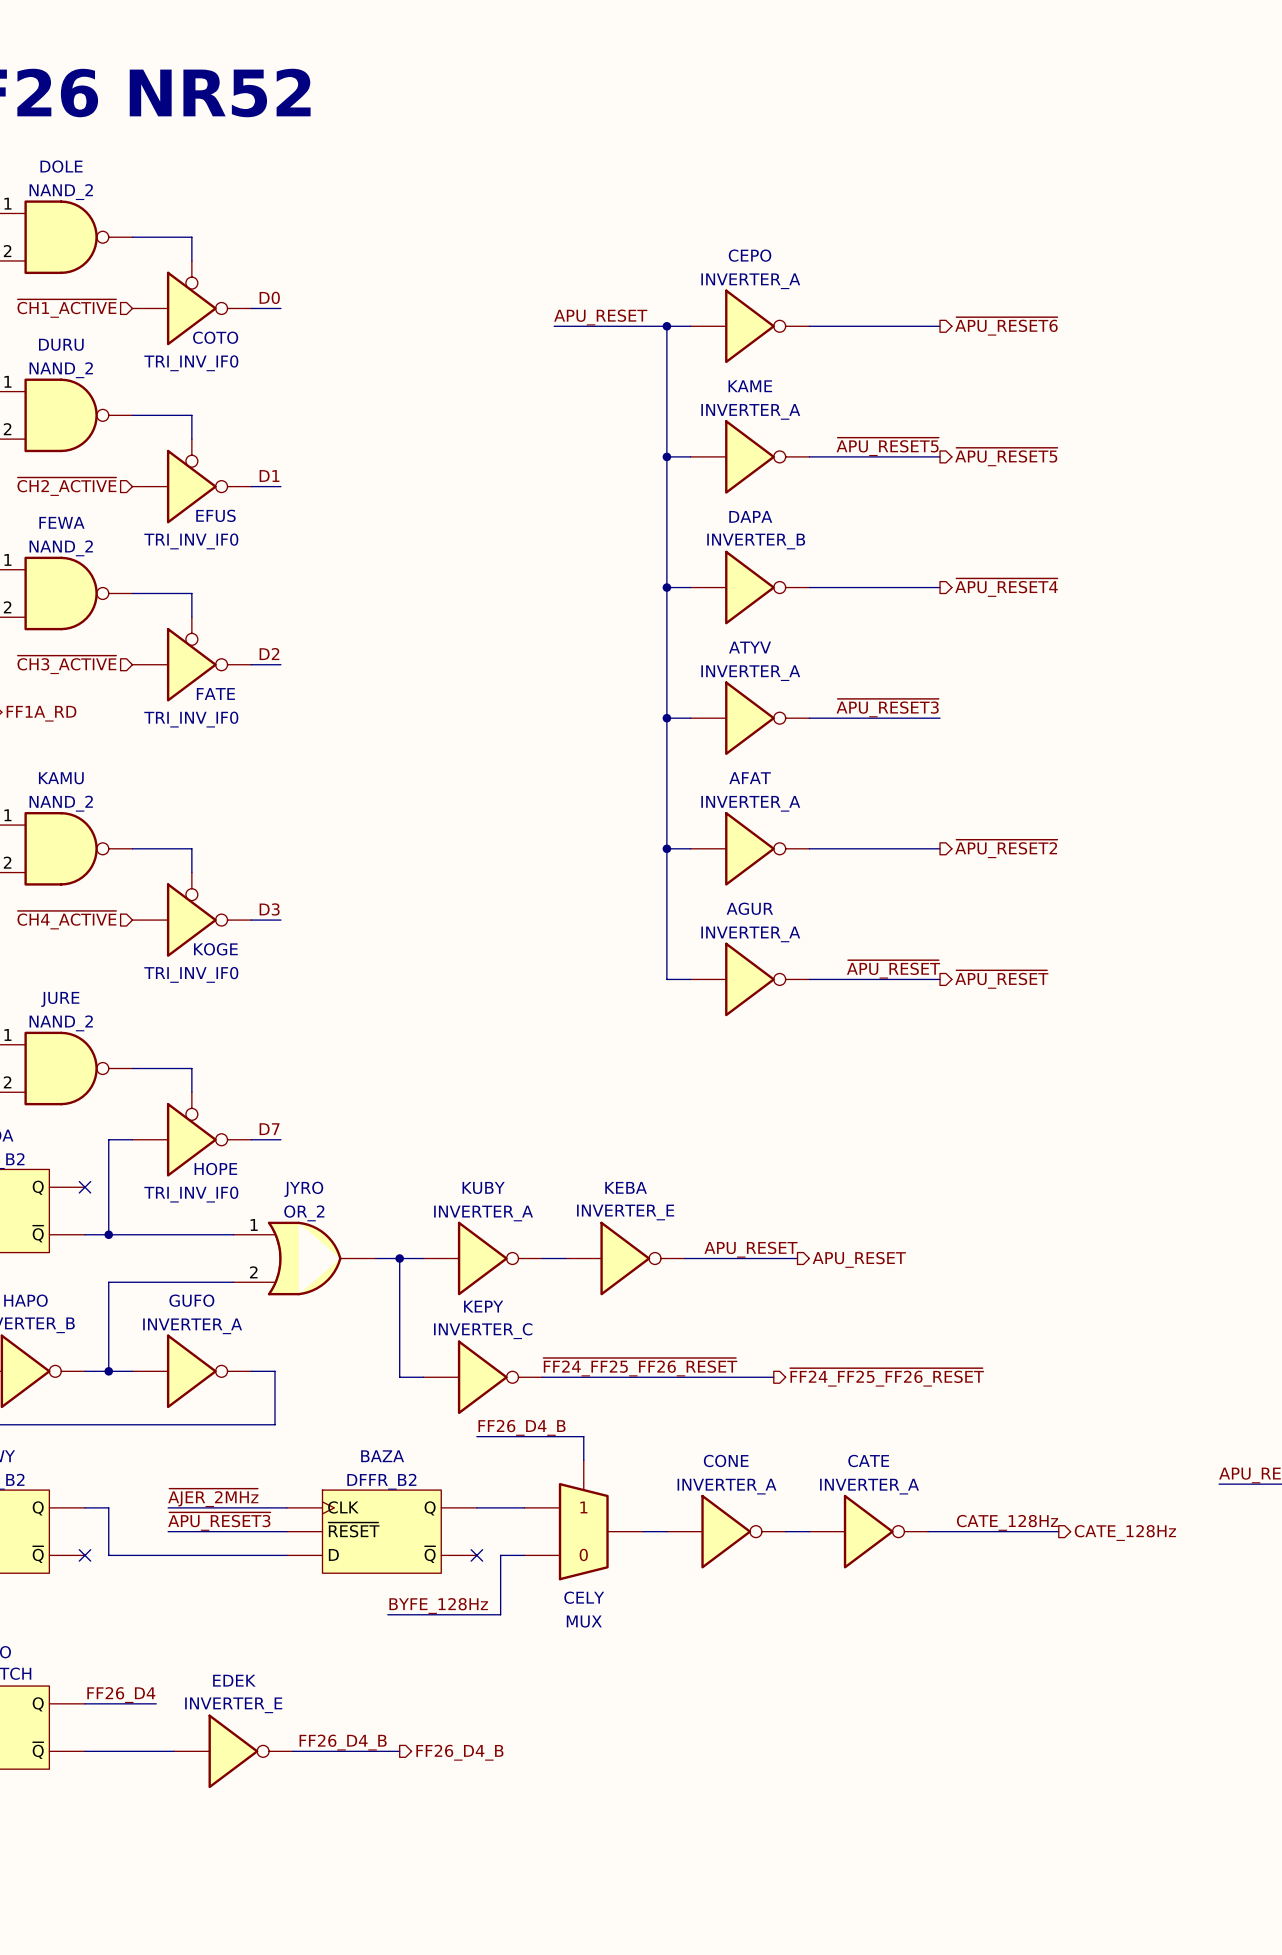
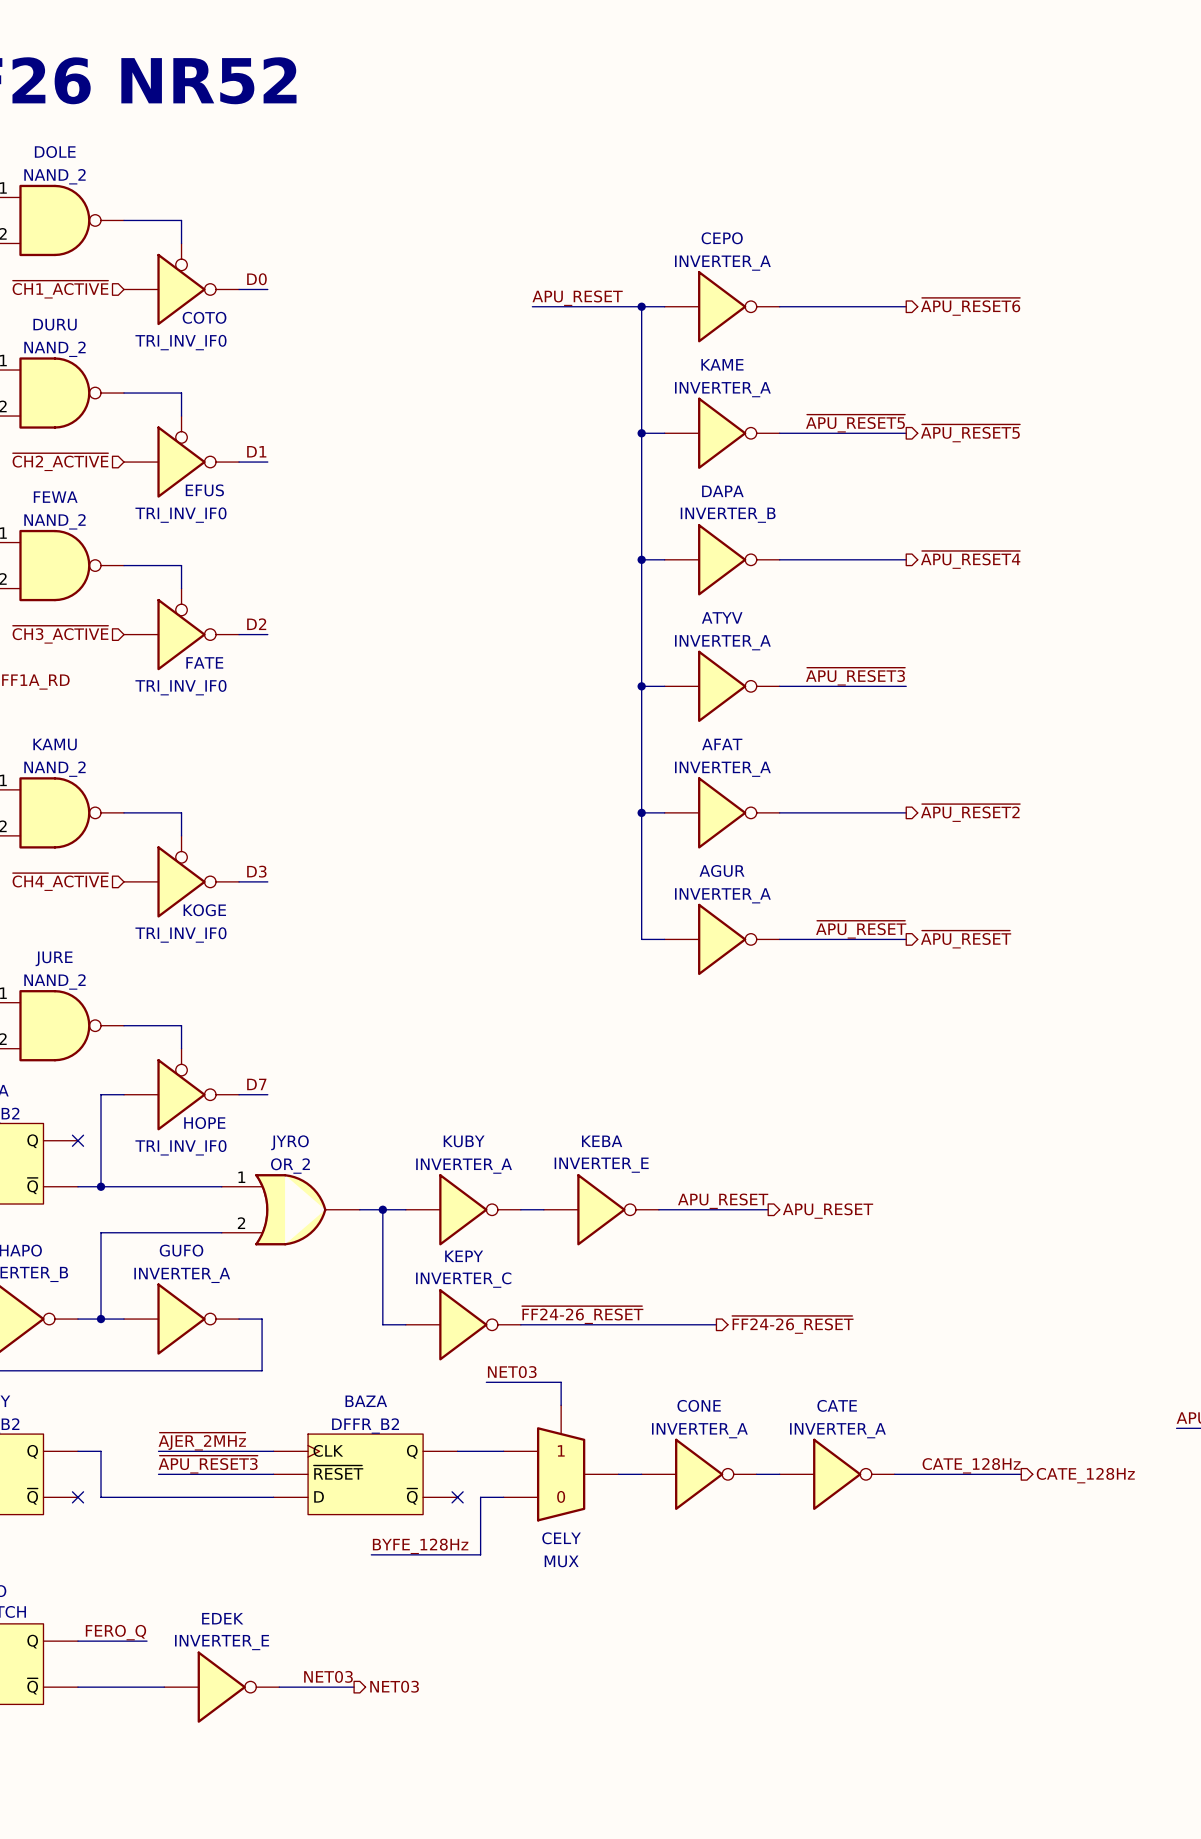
label: ~{FF24_FF25_FF26_RESET} (640, 1367) -> ~{FF24-26_RESET} (582, 1315)
wire: (744, 1377) (773, 1377) -> none
hierarchical label: ~{FF24_FF25_FF26_RESET} (886, 1377) -> ~{FF24-26_RESET} (792, 1324)
label: none -> NET03 (512, 1372)
label: FF26_D4_B (522, 1427) -> none
wire: (476, 1436) (506, 1436) -> none
label: FF26_D4 (121, 1695) -> FERO_Q (115, 1632)
label: none -> NET03 (328, 1676)
label: FF26_D4_B (343, 1742) -> none
hierarchical label: none -> NET03 (394, 1686)
wire: (370, 1751) (399, 1751) -> none
hierarchical label: FF26_D4_B (459, 1752) -> none

